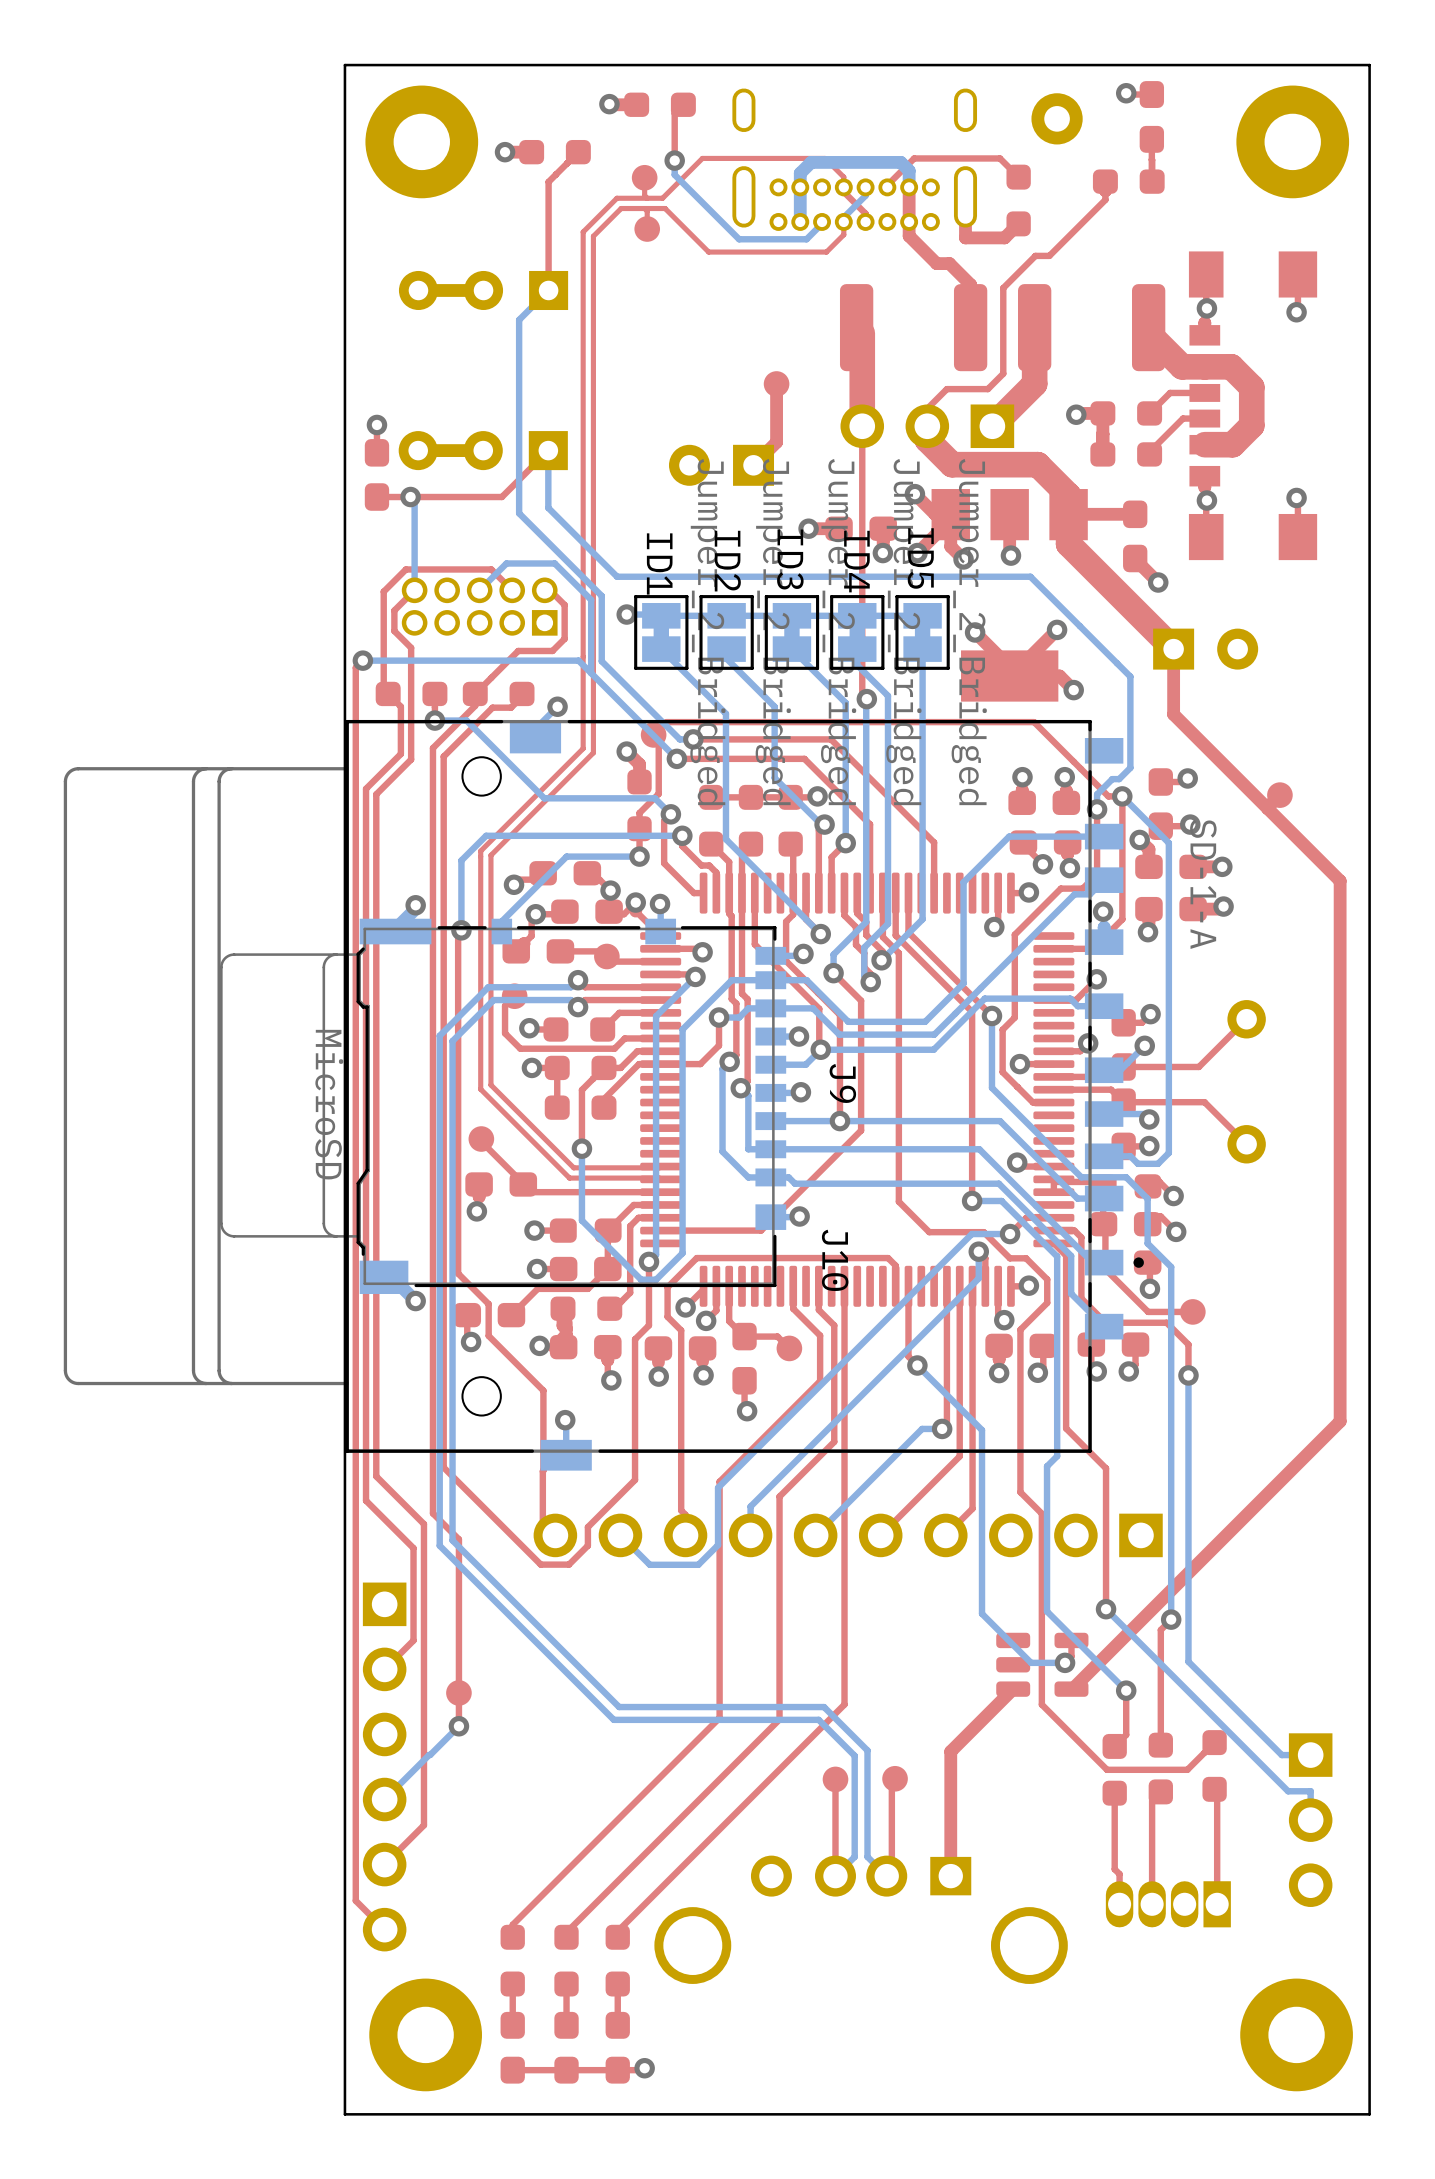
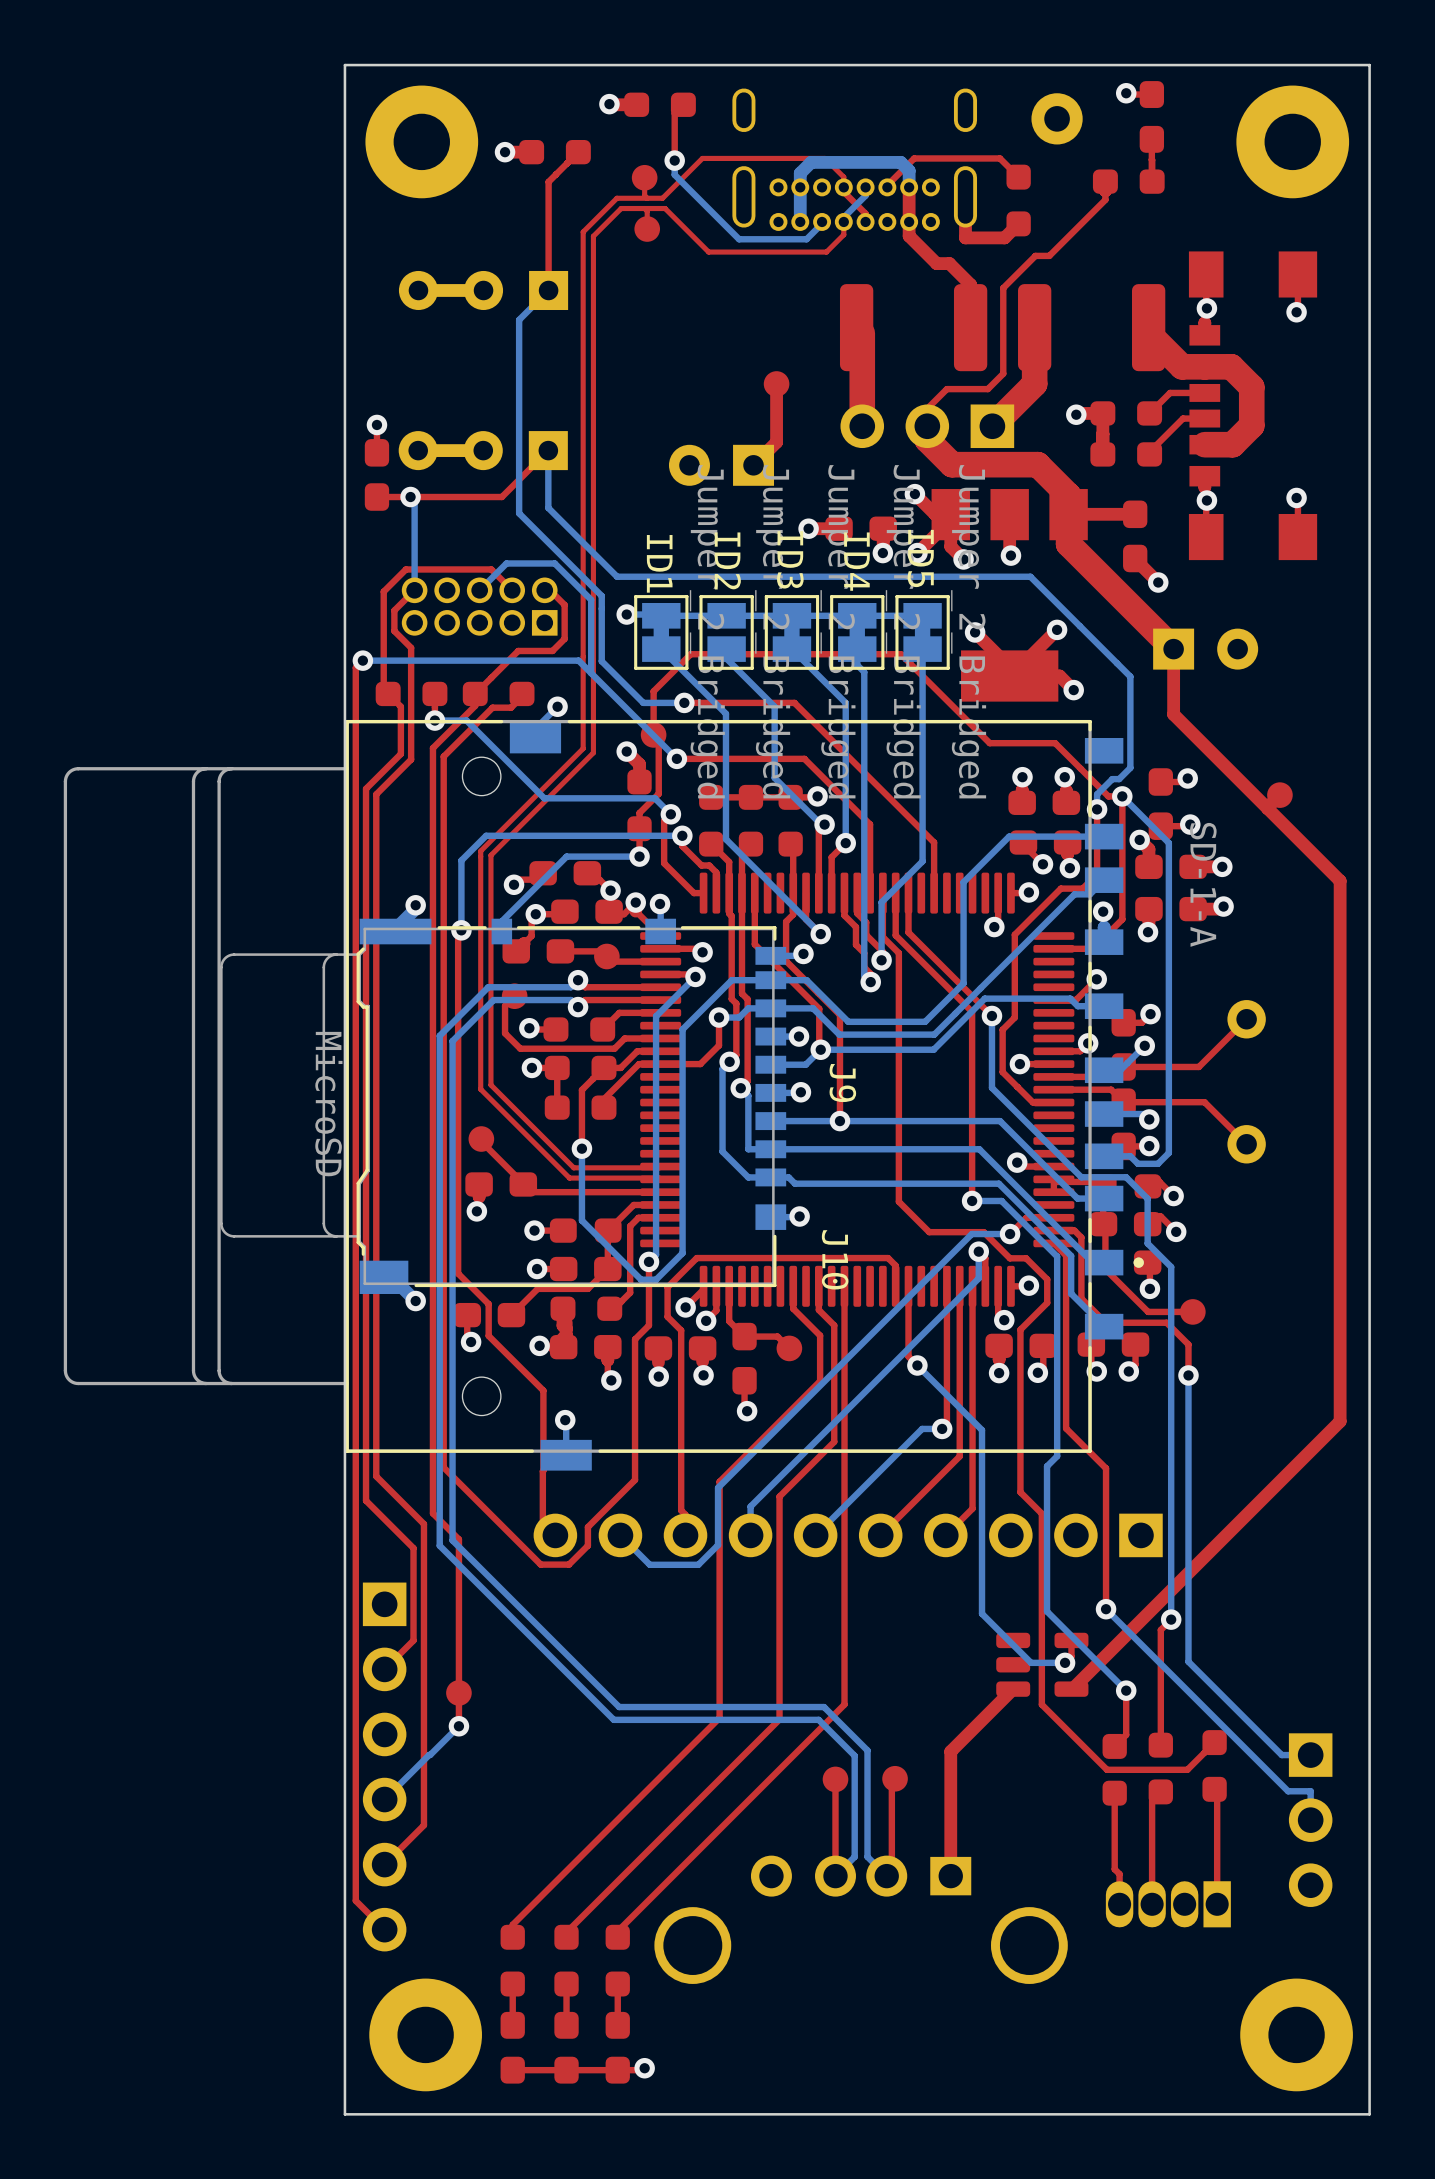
top track: (862, 426) (862, 694) (866, 699) -> none
bottom track: (864, 672) (888, 695) (888, 923) (864, 947) -> (864, 672) (864, 947)
bottom track: (866, 699) (866, 921) (833, 954) (833, 973) -> none
via: (866, 699) -> none
bottom track: (643, 702) (679, 739) (693, 739) -> (643, 702) (684, 702)
top track: (653, 734) (666, 722) (1034, 722) (1055, 743) -> (653, 734) (653, 691) (690, 654) (900, 654) (989, 743) (1055, 743)
via position: (693, 739) -> (684, 702)
top track: (831, 739) (693, 739) -> (831, 739) (794, 702) (684, 702)
bottom track: (922, 861) (922, 919) (881, 960) -> (922, 861) (881, 902) (881, 960)
top track: (833, 973) (861, 1000) (861, 1130) (761, 1230) (660, 1230) -> none
via: (833, 973) -> none

